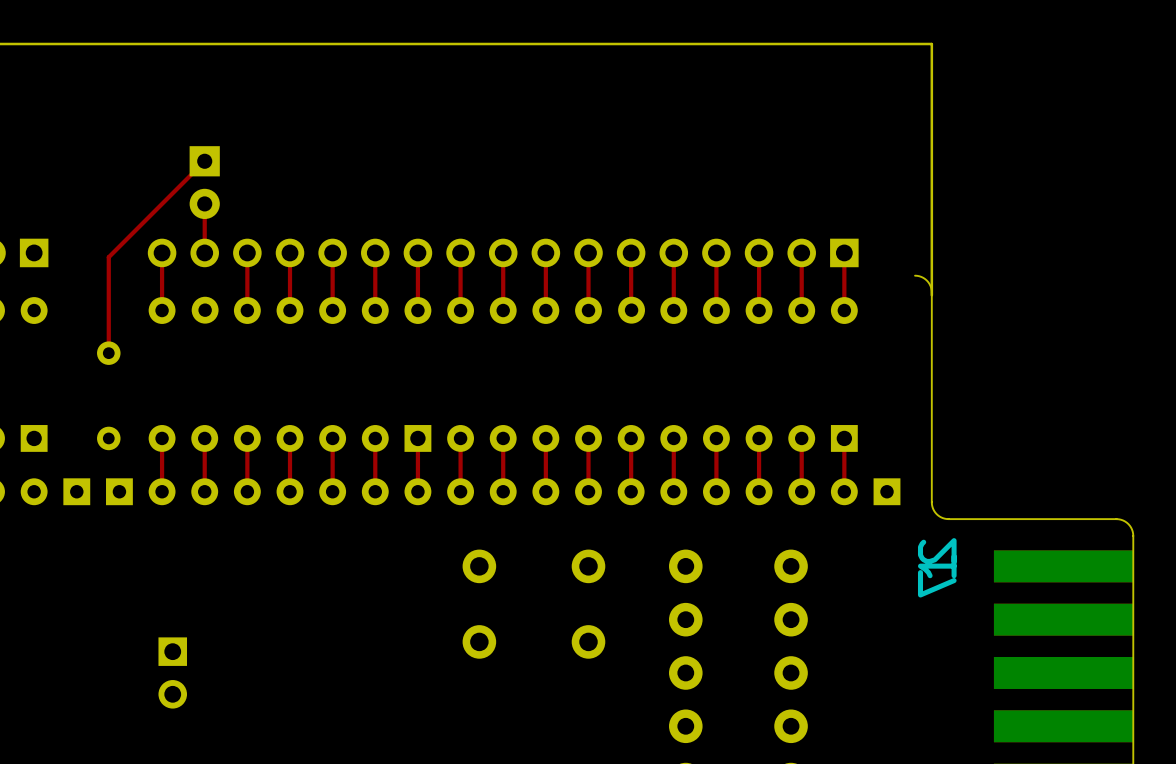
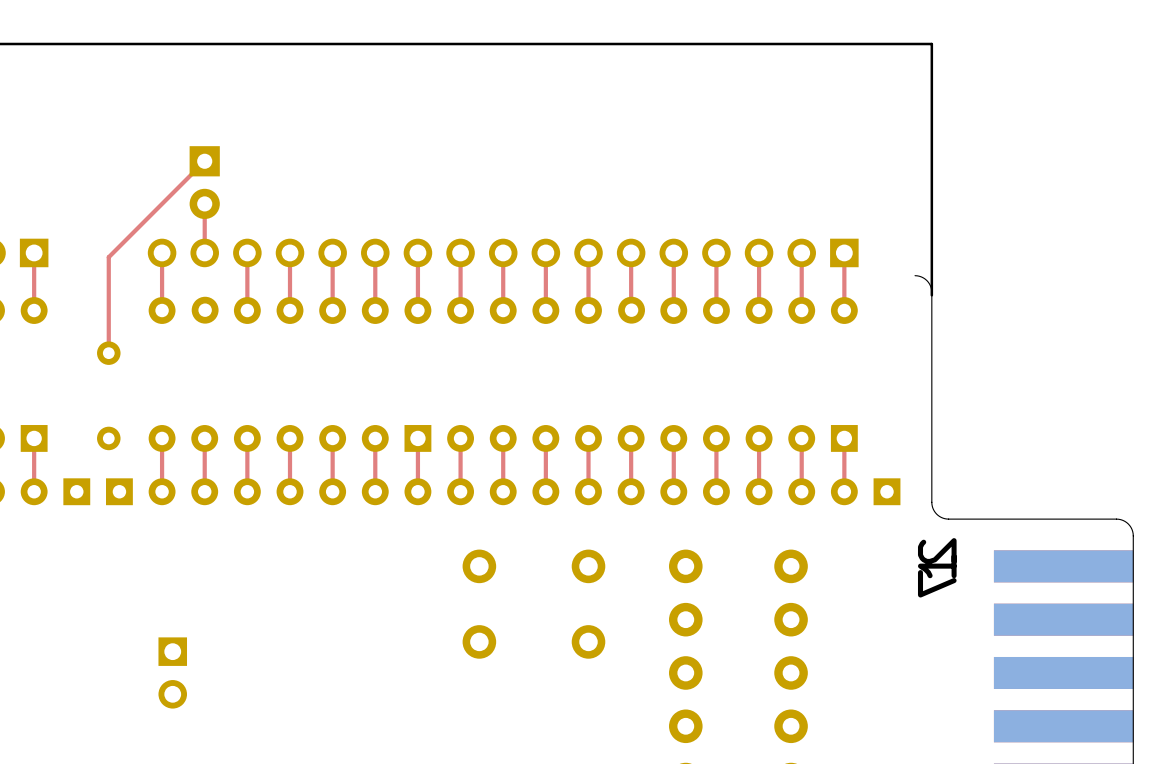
top track: none -> (34, 252) (34, 310)
top track: none -> (34, 438) (34, 491)

